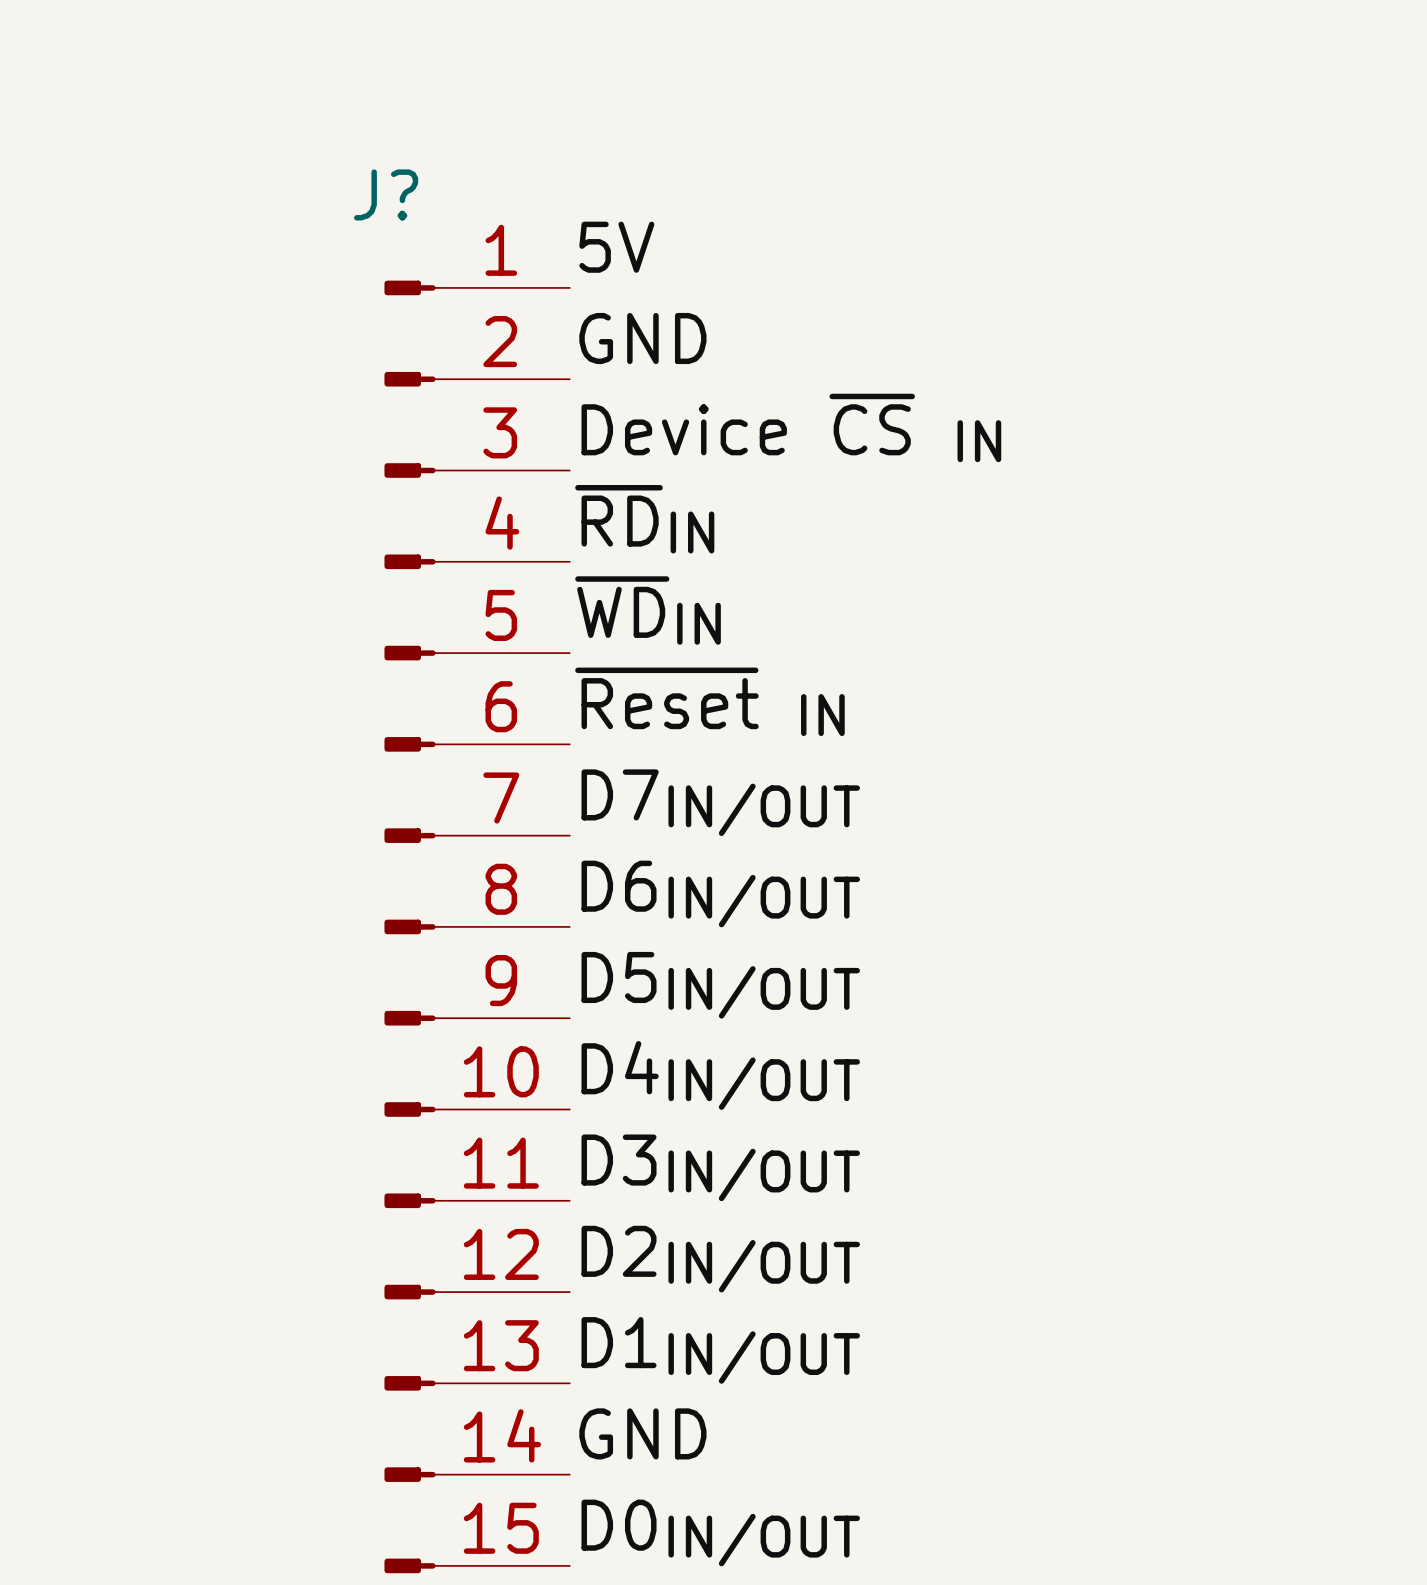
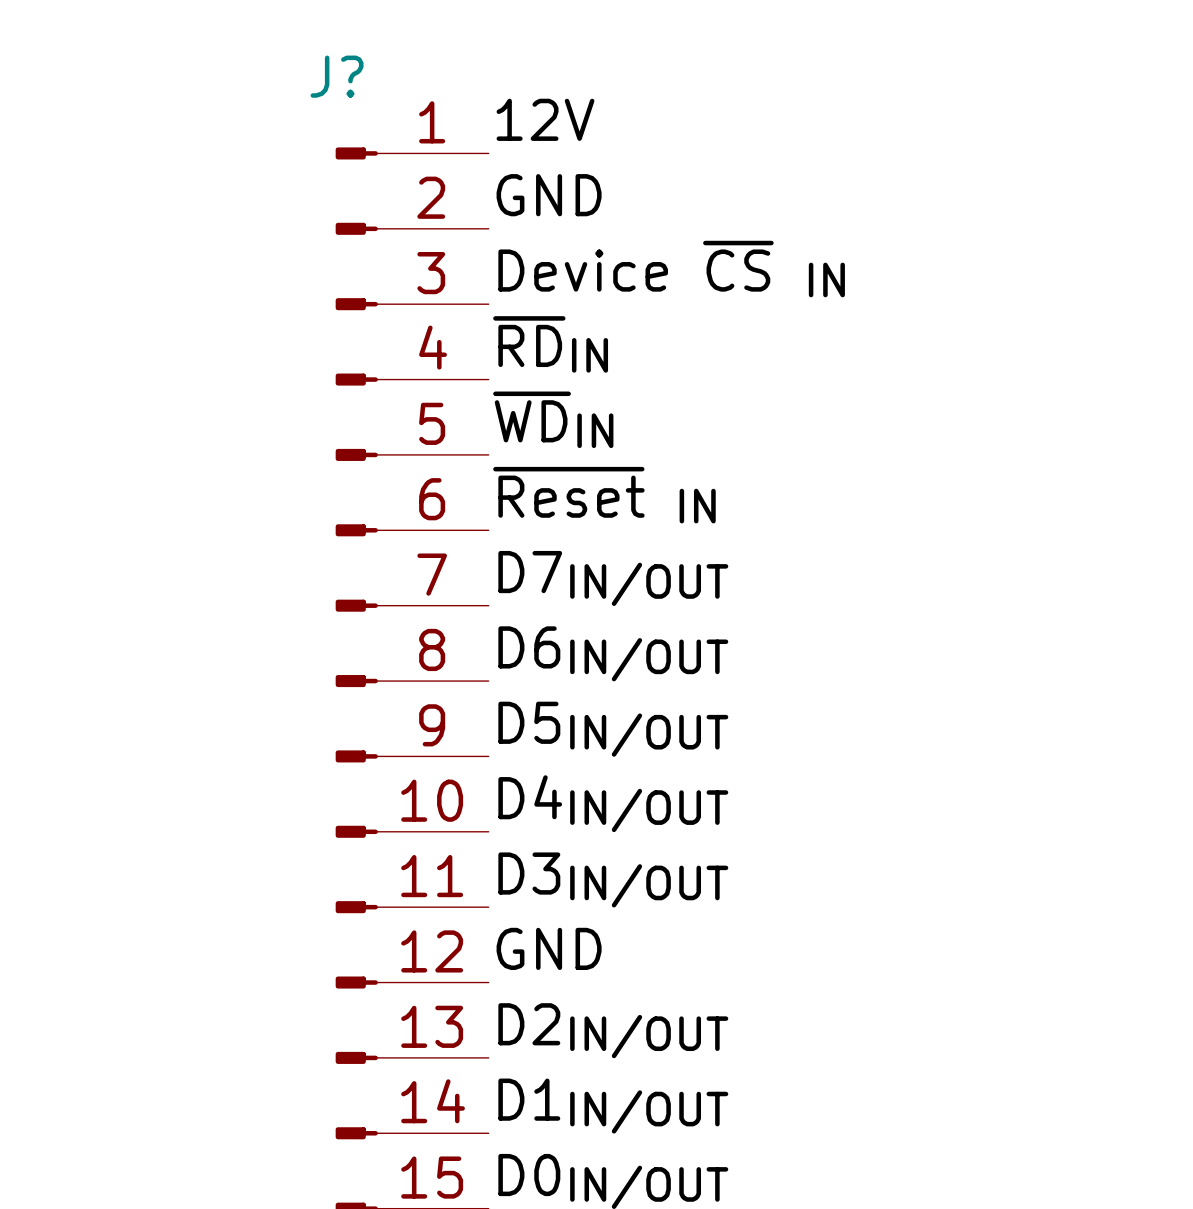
label: 5V (616, 247) -> 12V (545, 119)
label: D2IN/OUT (720, 1259) -> GND (549, 948)
label: D1IN/OUT (720, 1350) -> D2IN/OUT (613, 1030)
label: GND (642, 1433) -> D1IN/OUT (613, 1106)

